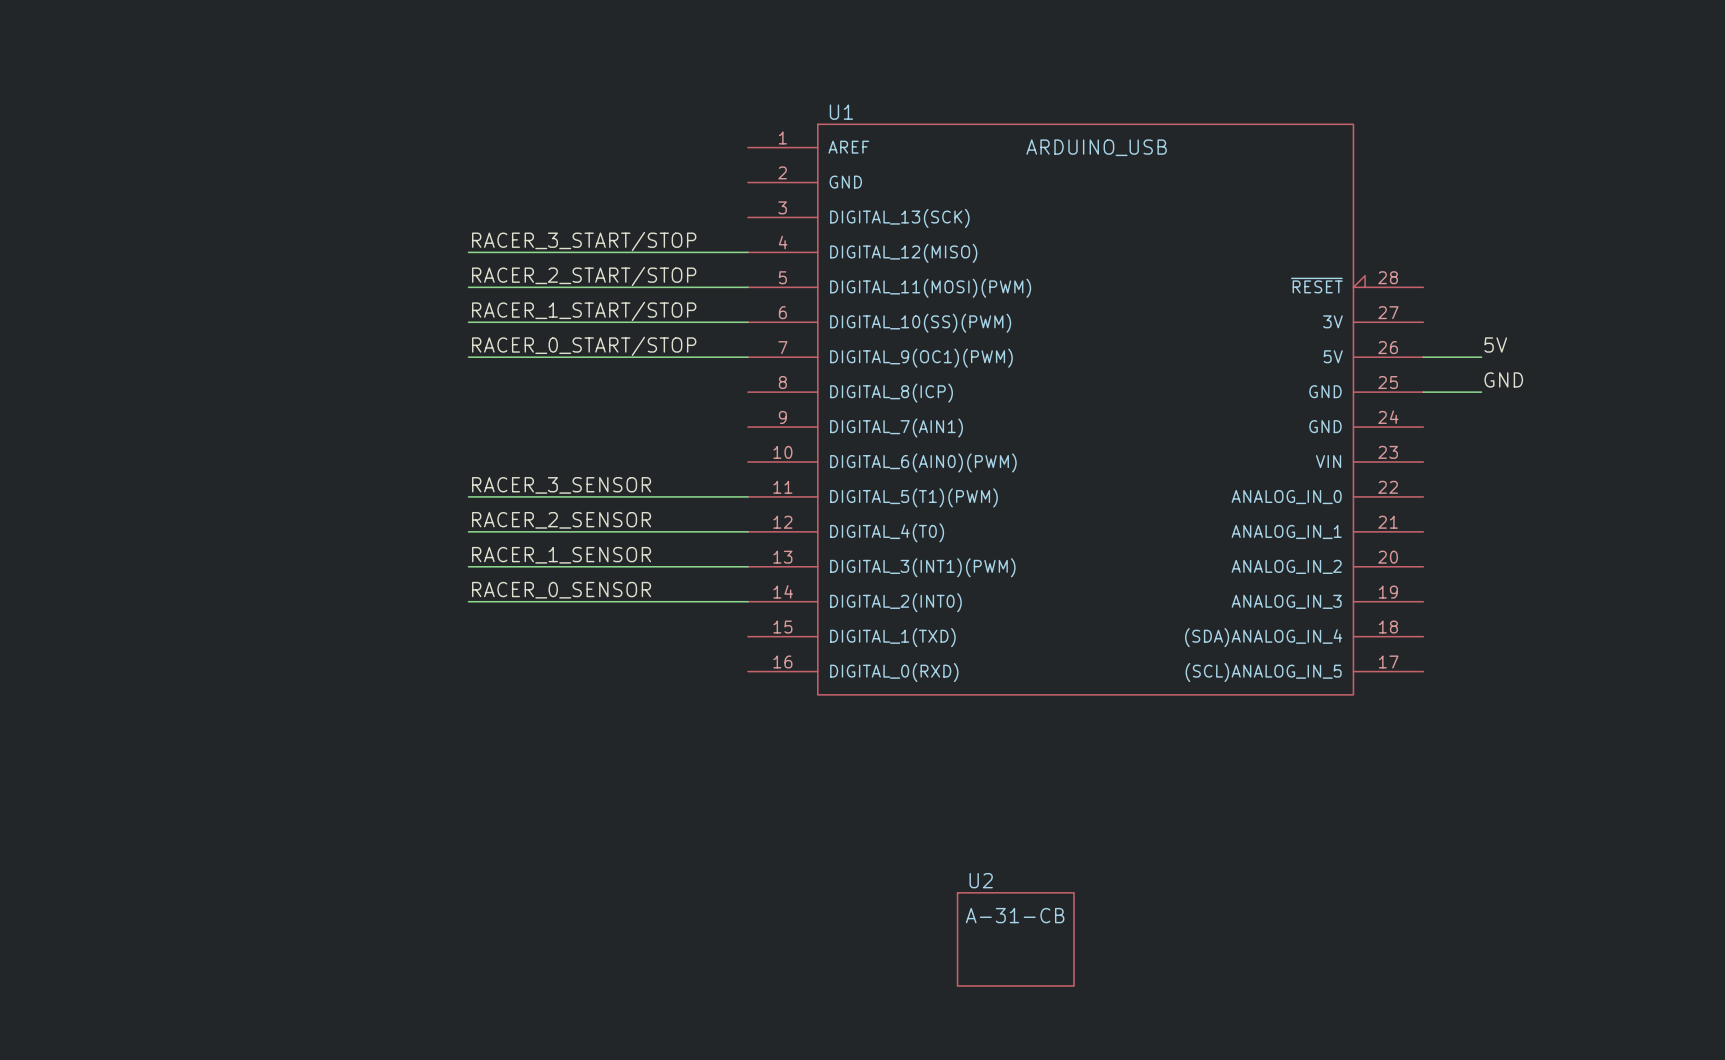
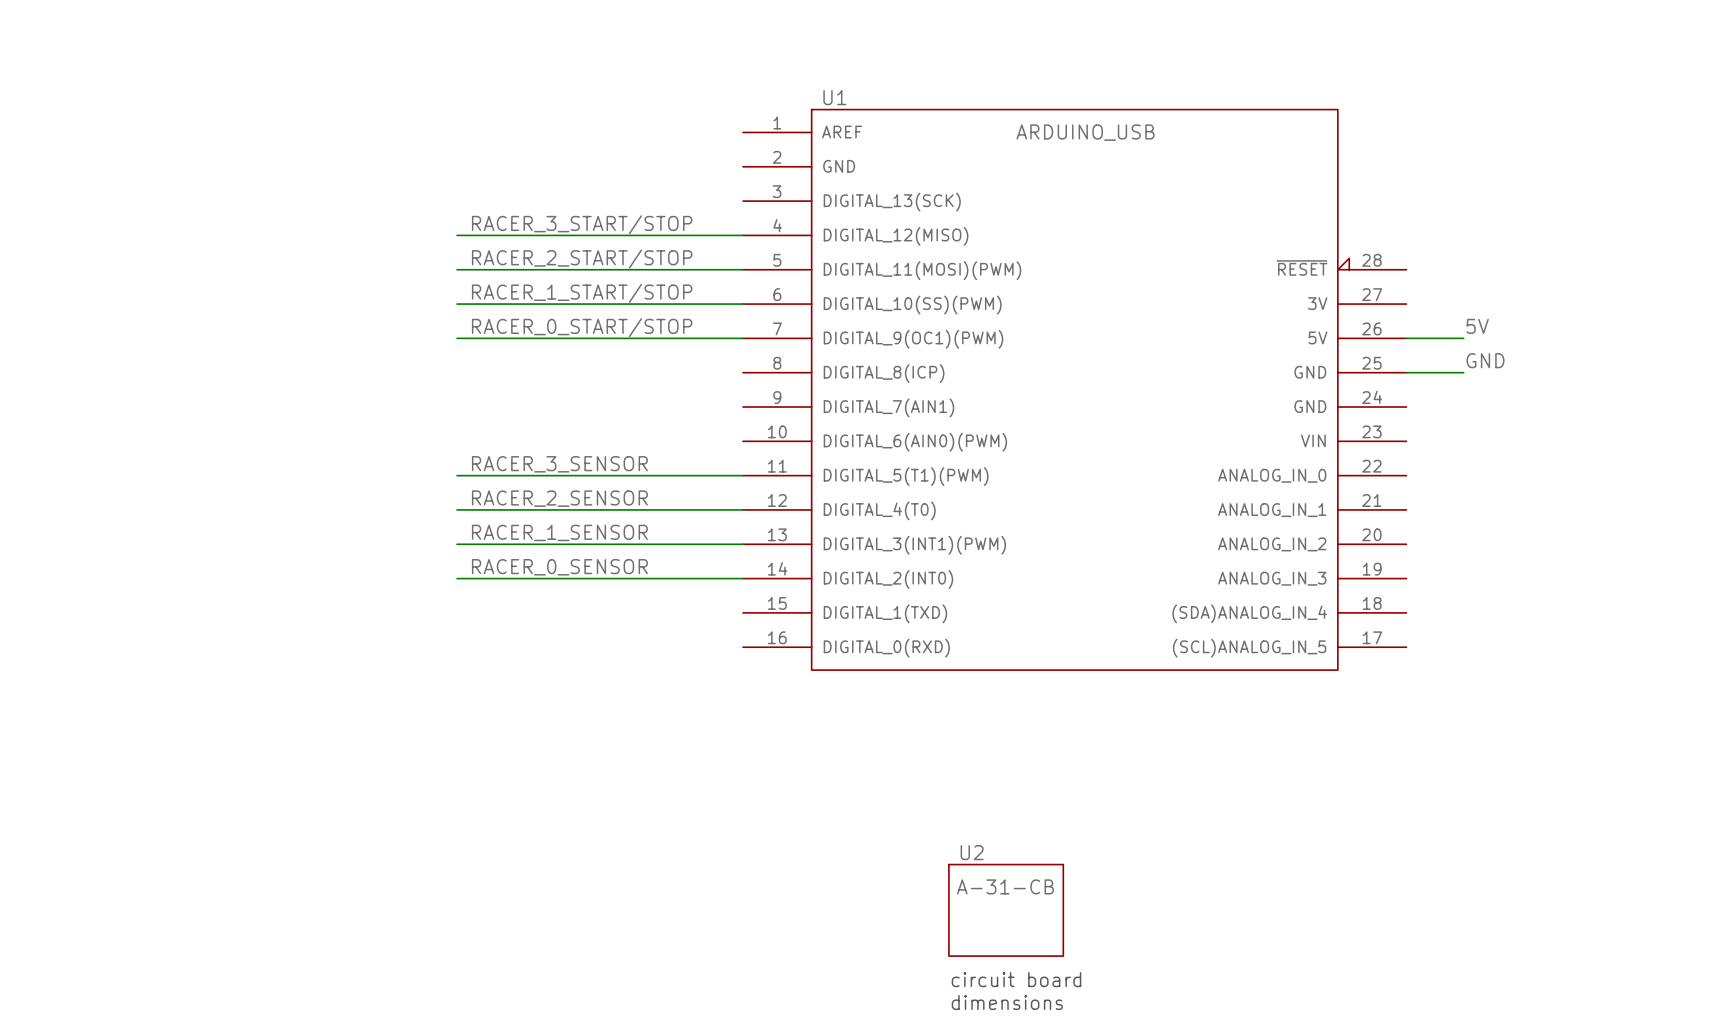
wire: none -> (457, 235) (468, 235)
wire: none -> (457, 269) (468, 269)
wire: none -> (457, 304) (468, 304)
wire: none -> (457, 338) (468, 338)
wire: none -> (457, 475) (468, 475)
wire: none -> (457, 509) (468, 509)
wire: none -> (457, 544) (468, 544)
wire: none -> (457, 578) (468, 578)
text: none -> circuit board (1016, 979)
text: none -> dimensions (1007, 1002)

